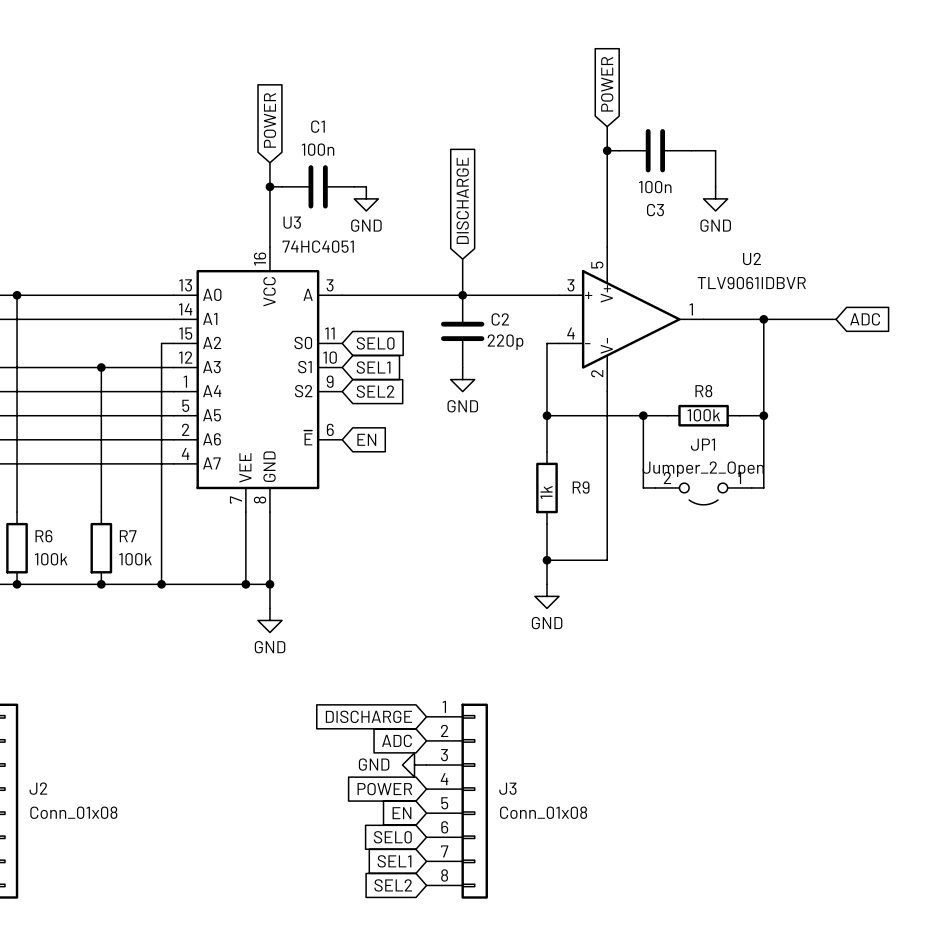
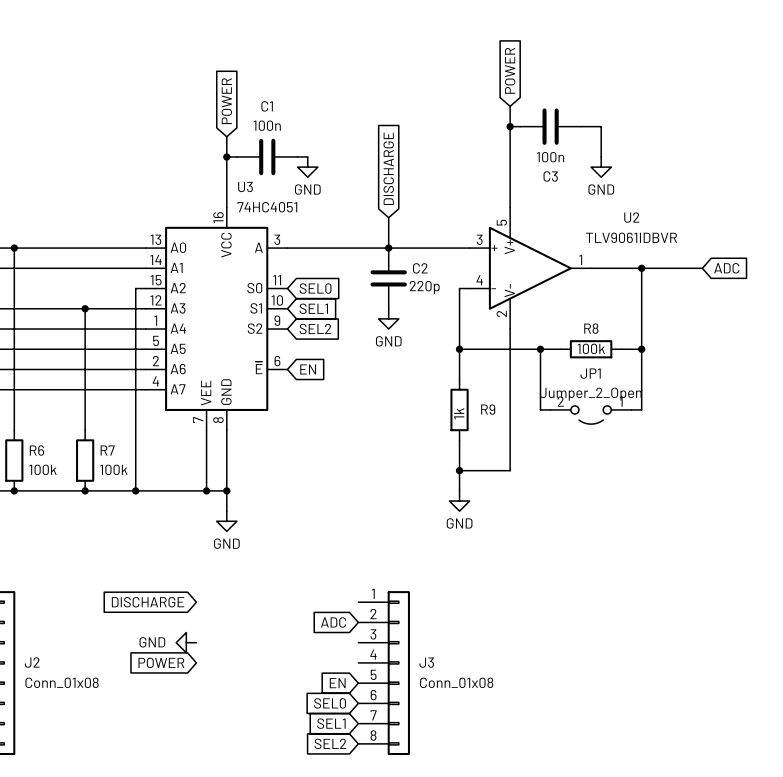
global label position: DISCHARGE (368, 716) -> DISCHARGE (148, 602)
power symbol position: GND (414, 765) -> GND (186, 642)
global label position: POWER (384, 789) -> POWER (161, 662)

